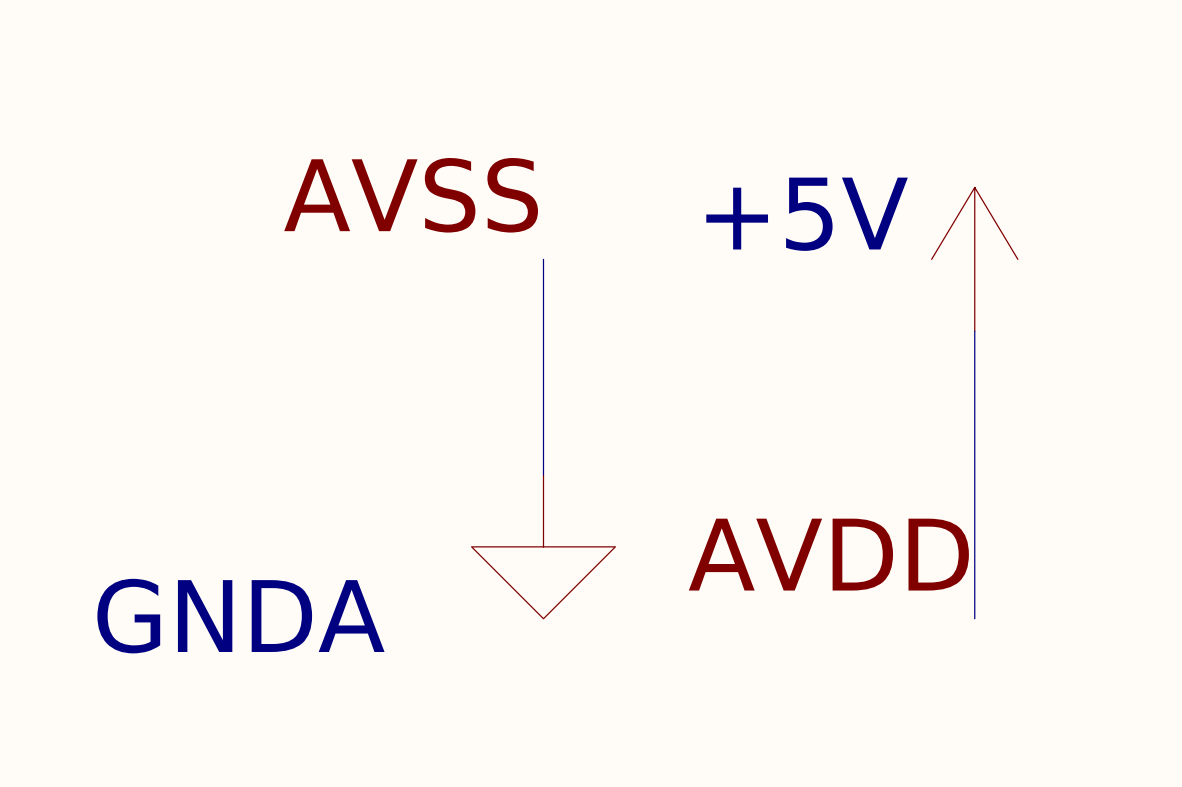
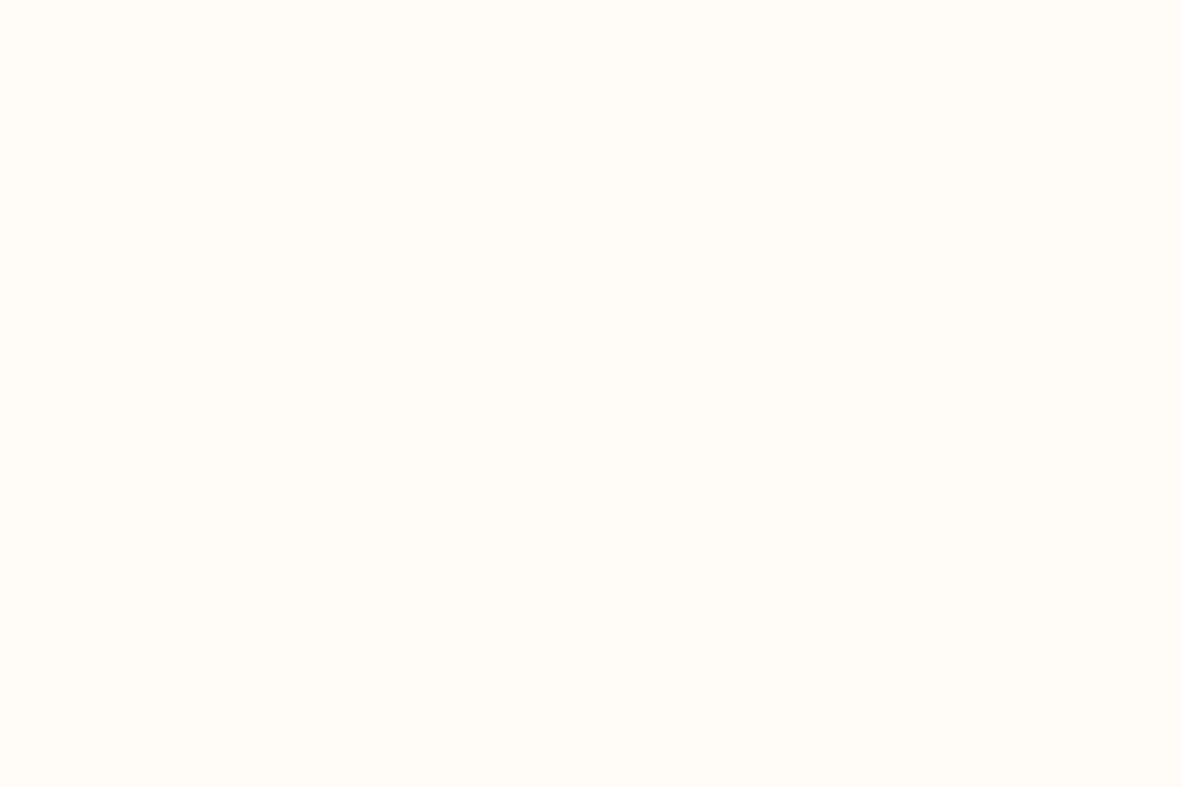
label: AVSS (411, 195) -> none
wire: (543, 259) (543, 474) -> none
power symbol: +5V (974, 259) -> none
wire: (974, 331) (974, 618) -> none
power symbol: GNDA (543, 546) -> none
label: AVDD (828, 554) -> none

